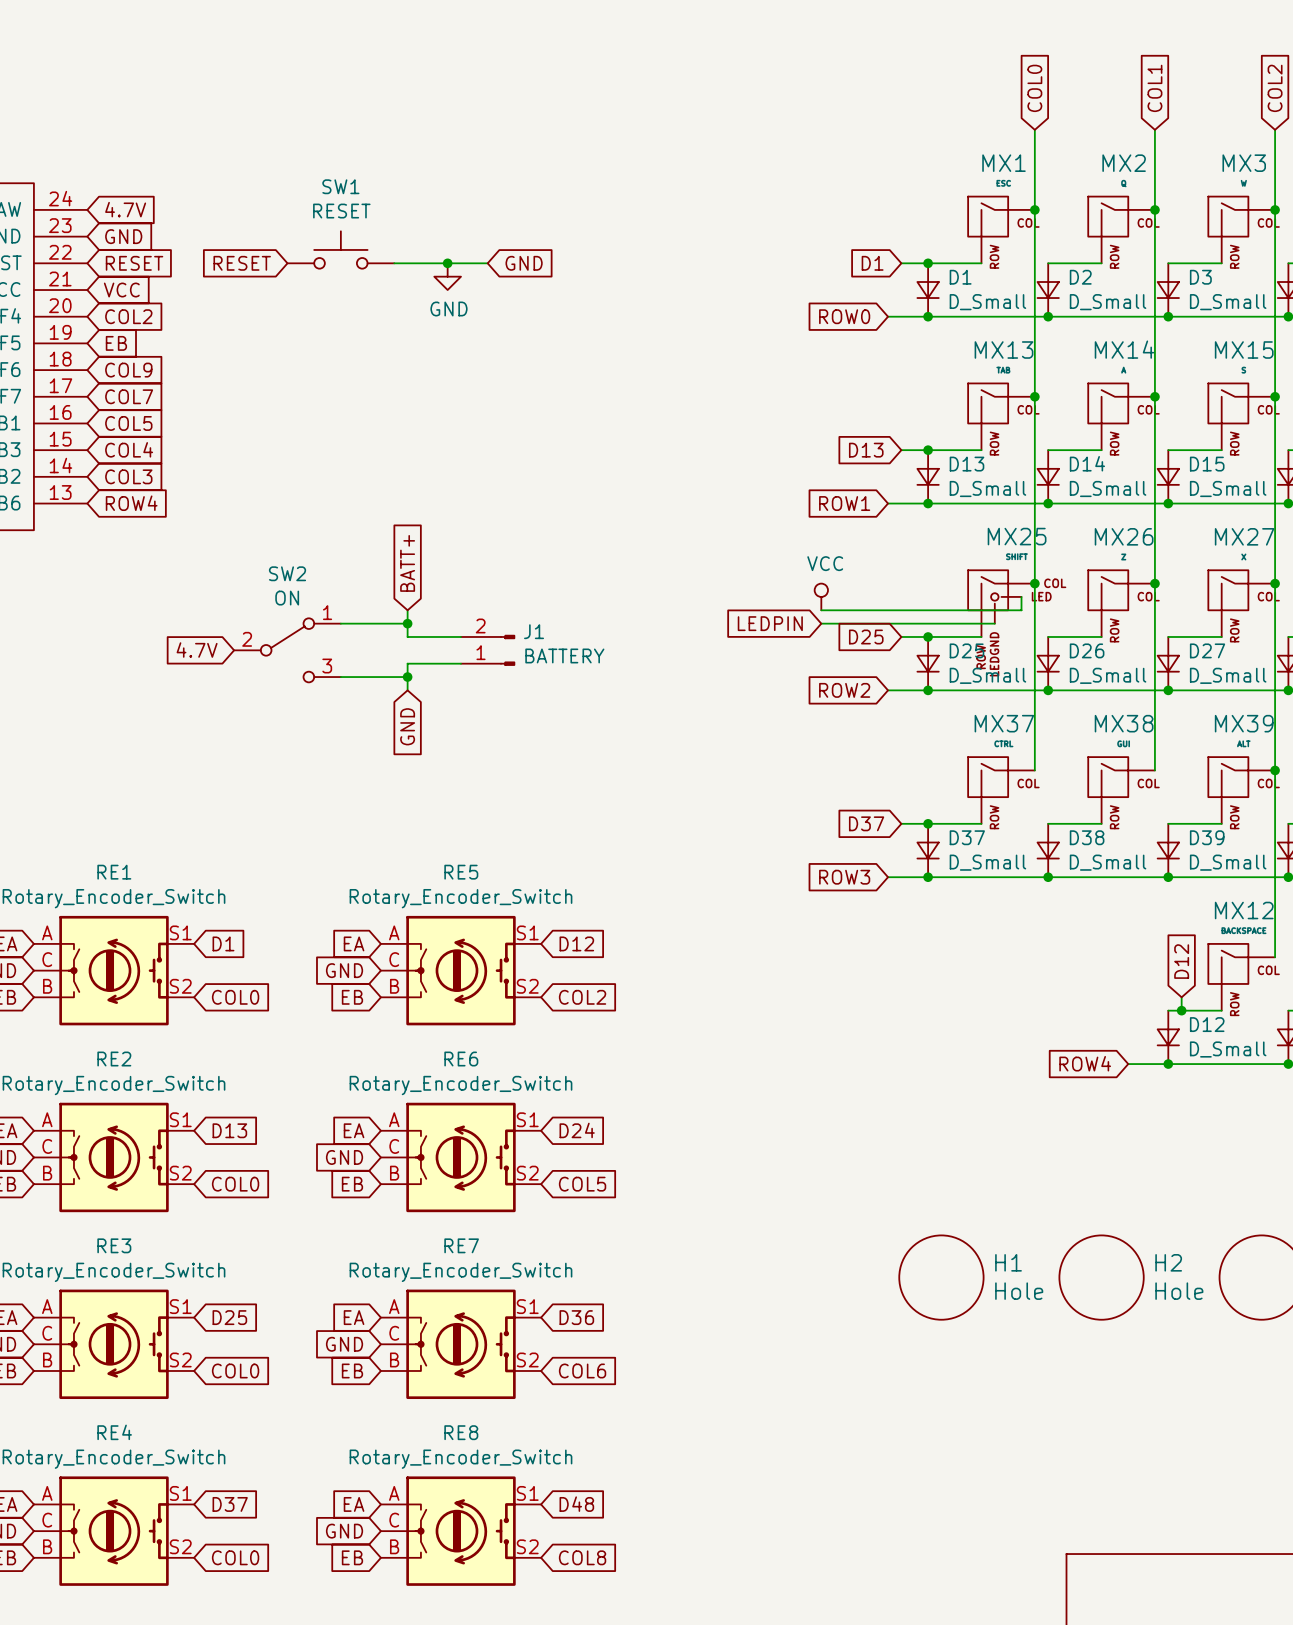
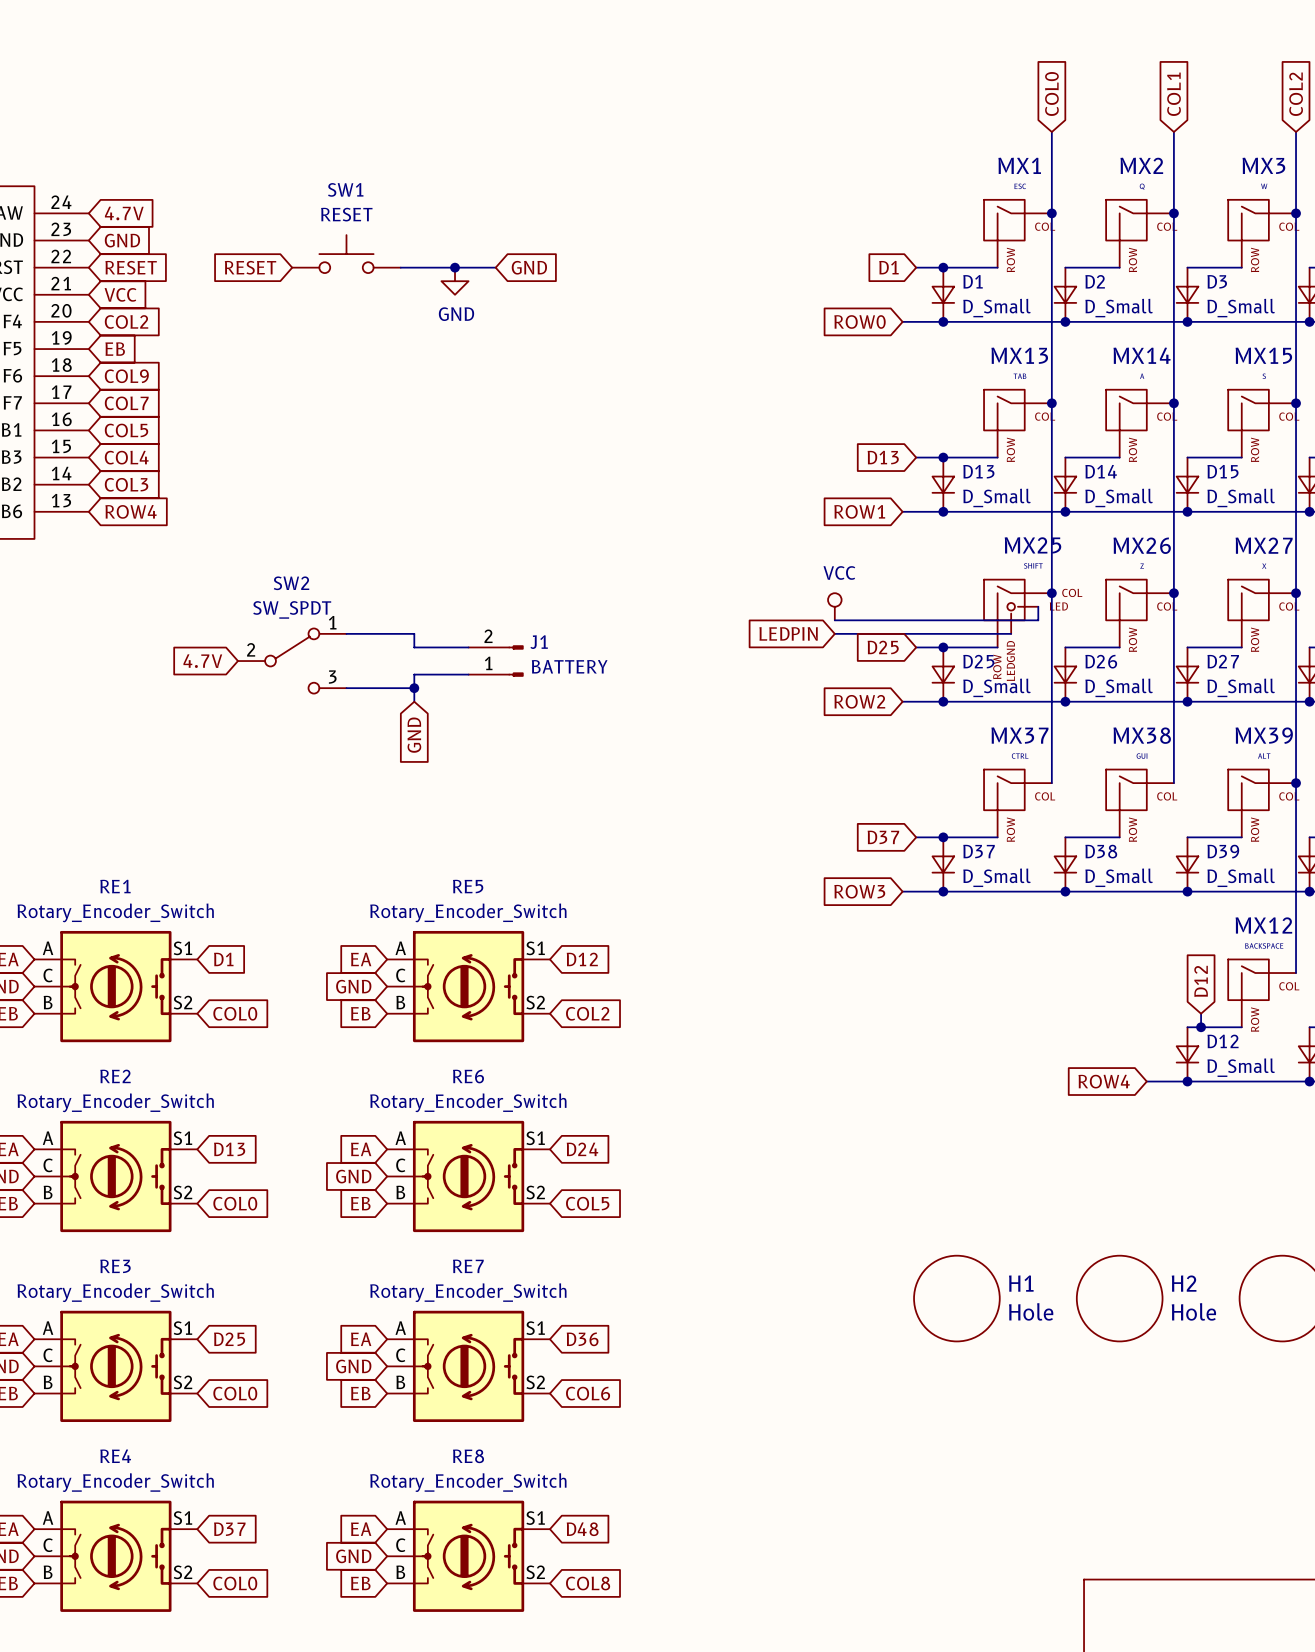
global label: BATT+ (407, 563) -> none
SW2 value: ON (287, 598) -> SW_SPDT (292, 609)
wire: (407, 610) (407, 623) -> none
junction: (407, 623) -> none

